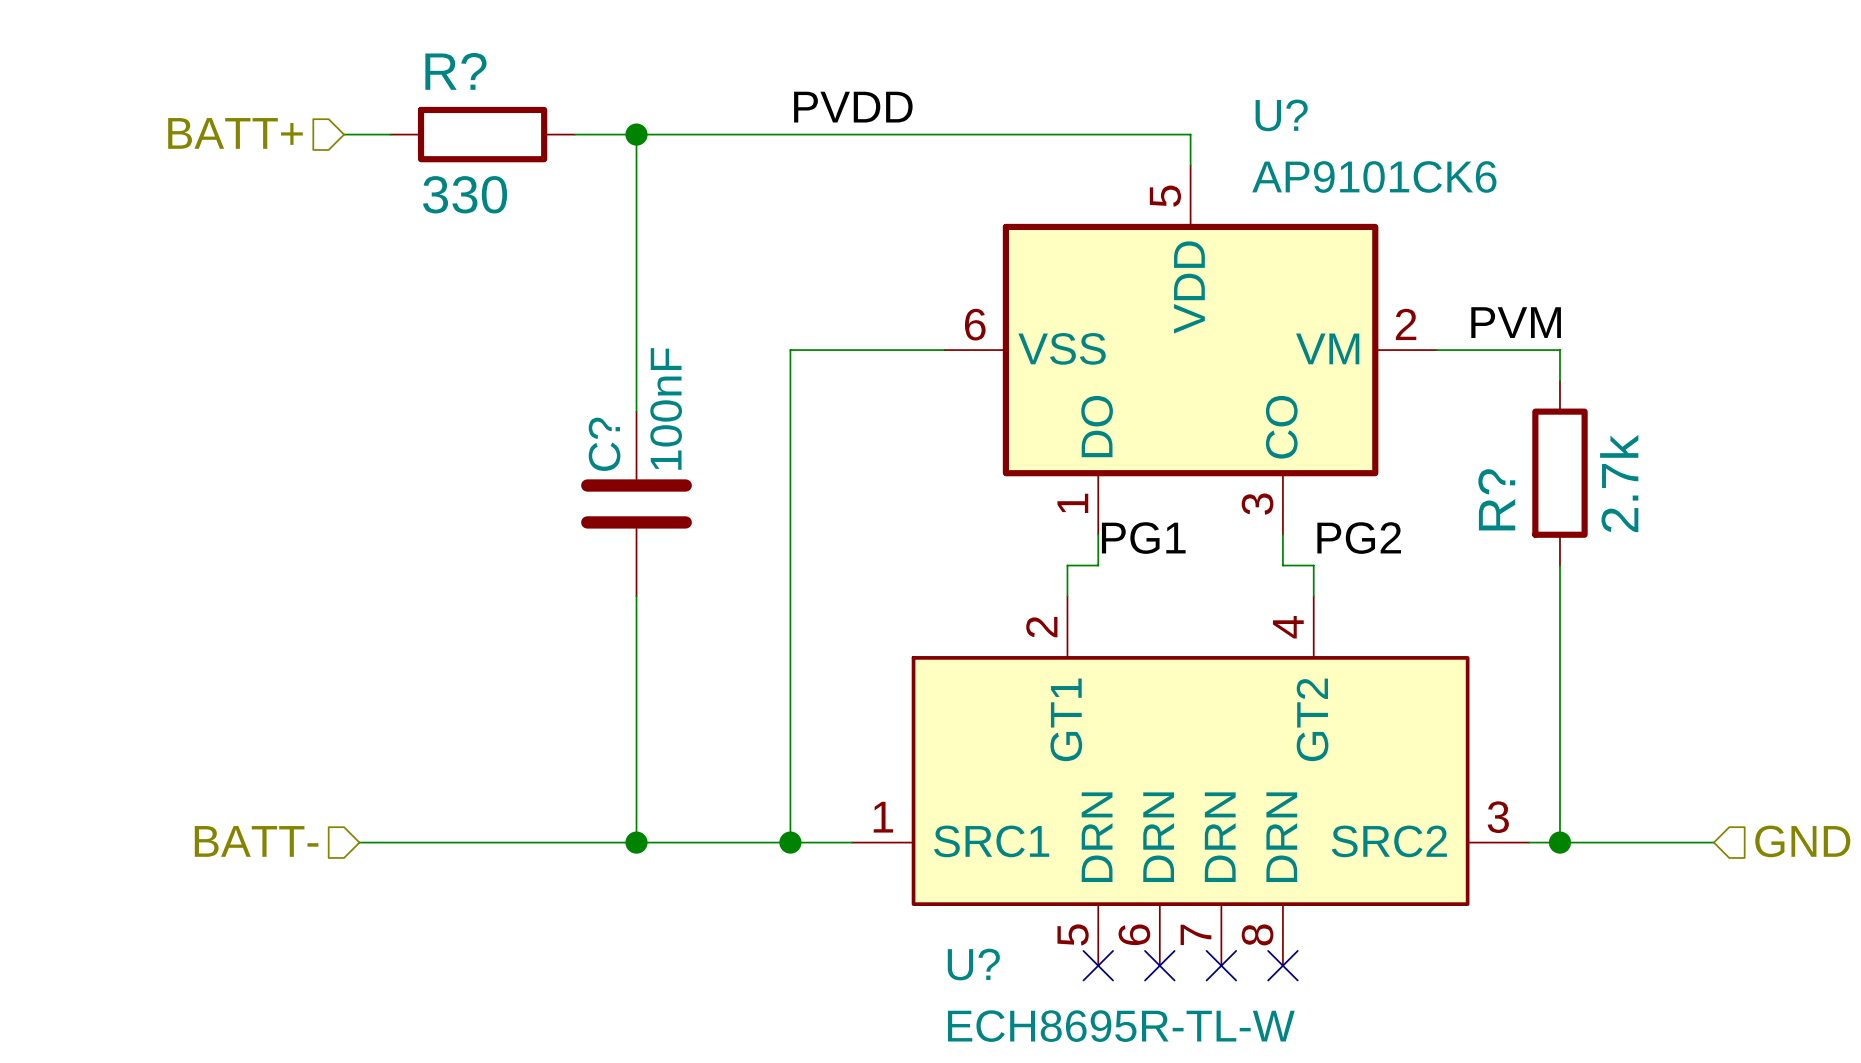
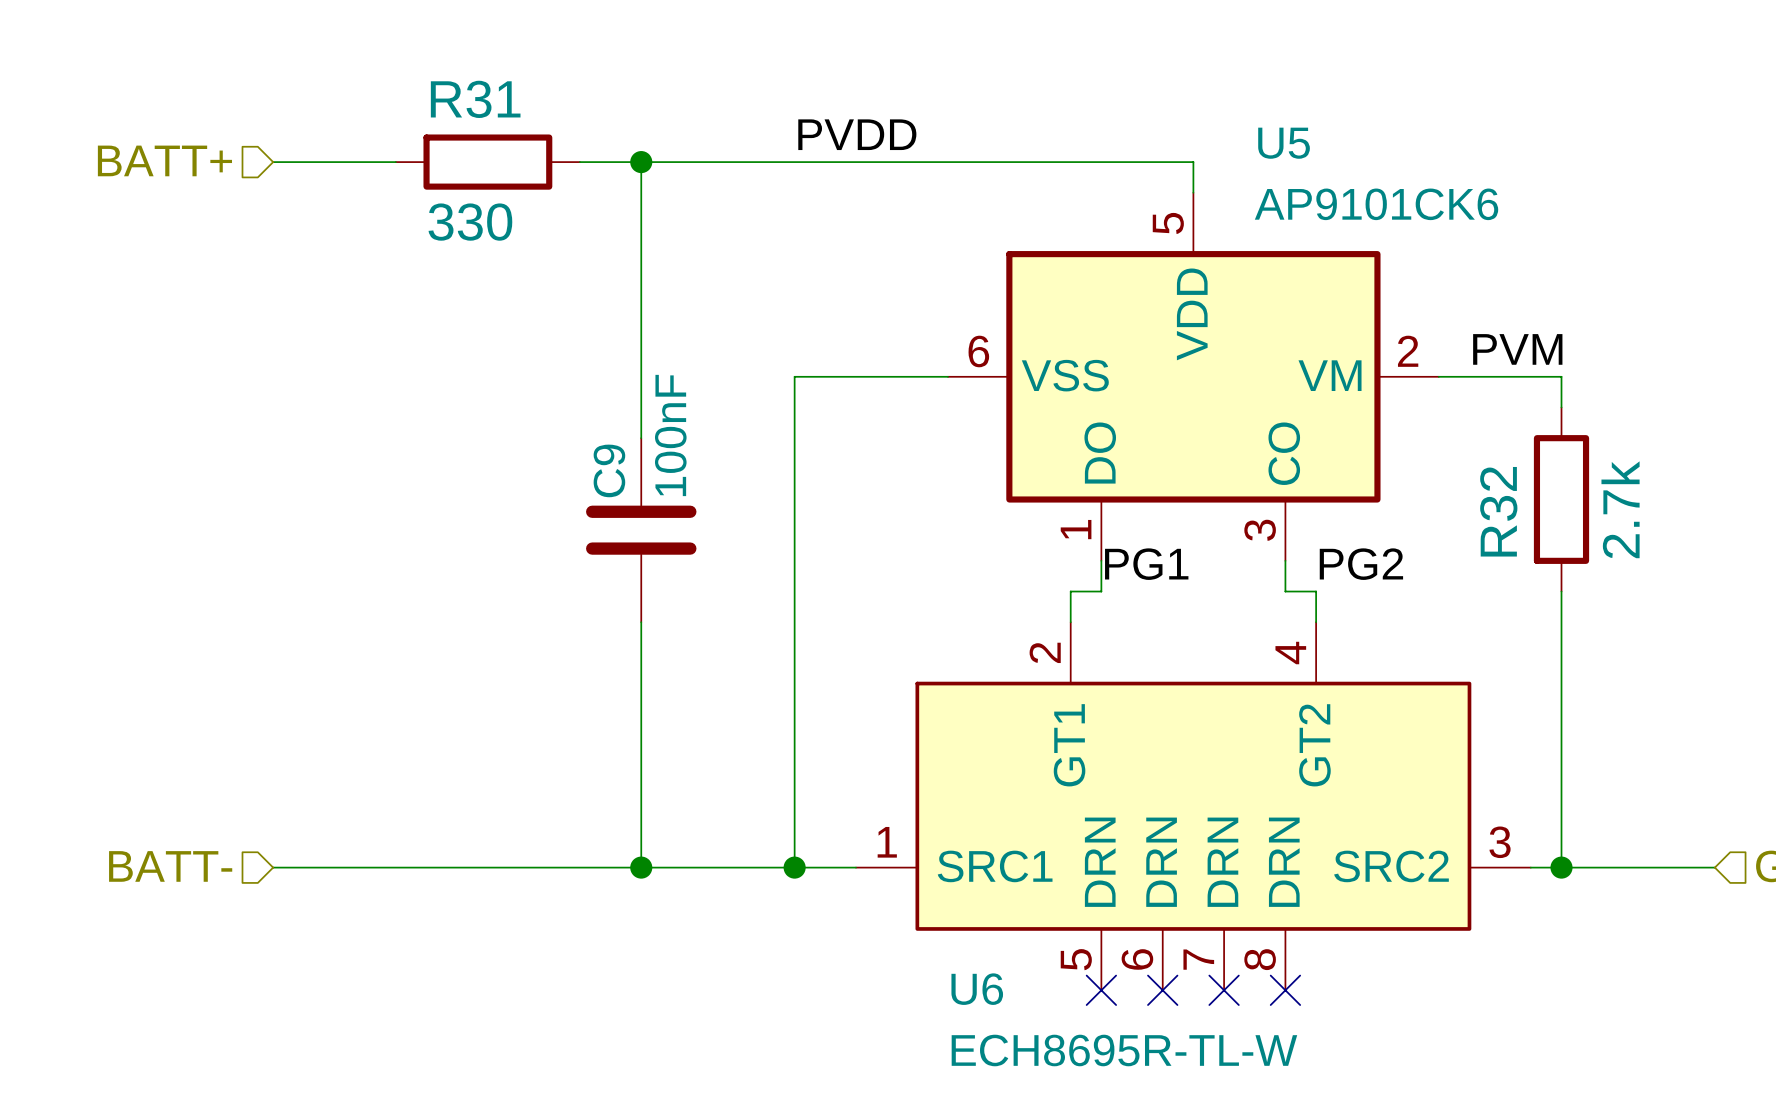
R? name: R? (455, 71) -> R31 (475, 99)
U? name: U? (1281, 115) -> U5 (1284, 143)
hierarchical label position: BATT+ (235, 133) -> BATT+ (164, 160)
wire: none -> (273, 162) (349, 162)
C? name: C? (604, 444) -> C9 (609, 470)
R? name: R? (1496, 499) -> R32 (1498, 511)
hierarchical label position: BATT- (256, 841) -> BATT- (170, 866)
wire: none -> (273, 867) (365, 867)
U? name: U? (973, 964) -> U6 (977, 989)

